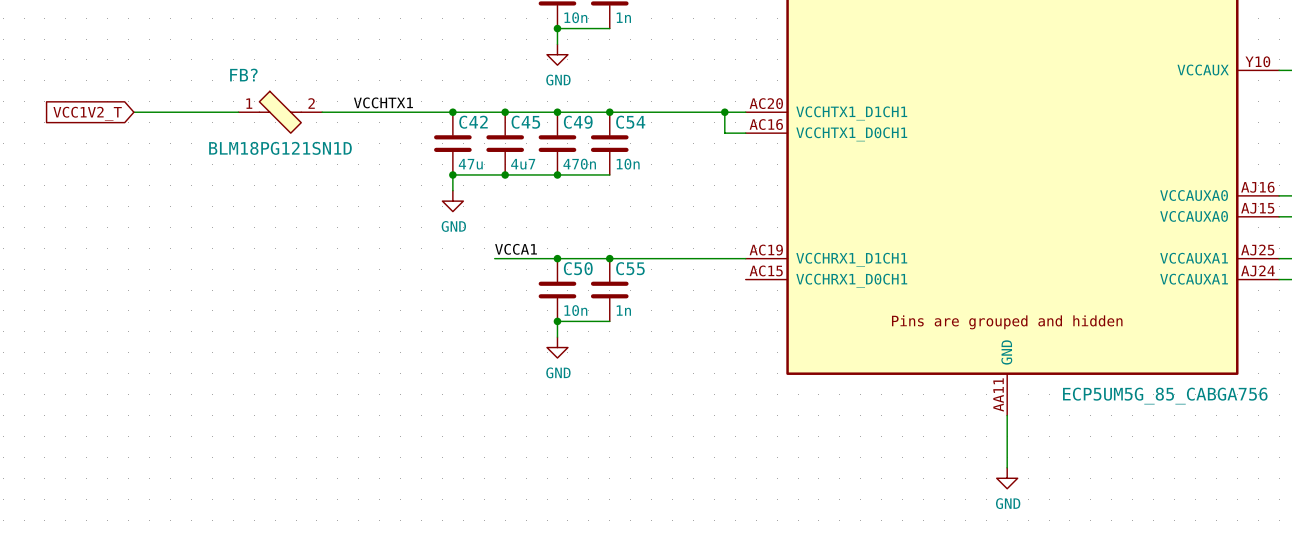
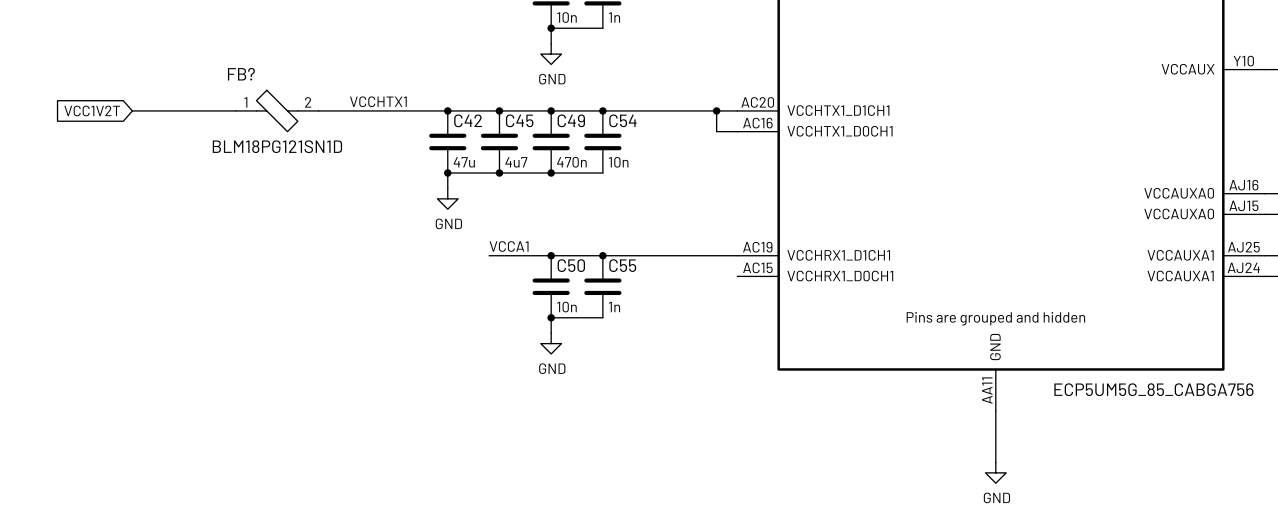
global label: VCC1V2_T (87, 113) -> VCC1V2T (92, 110)

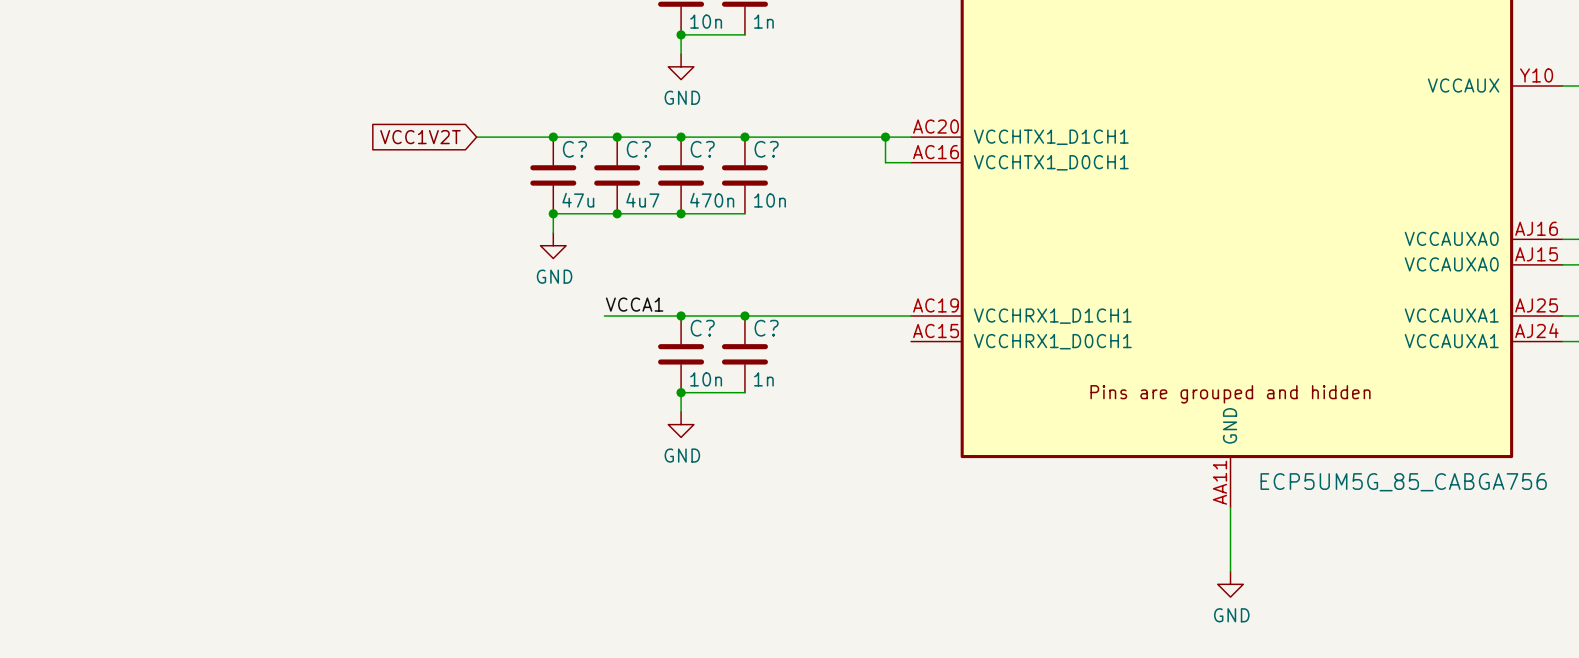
label: VCCHTX1 (378, 101) -> none
global label: VCC1V2T (92, 110) -> none
wire: (132, 110) (235, 110) -> none
FB?: BLM18PG121SN1D (277, 110) -> none
wire: (318, 110) (385, 110) -> none
global label: none -> VCC1V2T (420, 137)
C42 name: C42 (468, 120) -> C? (574, 149)
C45 name: C45 (519, 120) -> C? (638, 149)
C49 name: C49 (571, 120) -> C? (702, 149)
C54 name: C54 (622, 120) -> C? (766, 149)
C50 name: C50 (571, 265) -> C? (702, 328)
C55 name: C55 (622, 265) -> C? (766, 328)

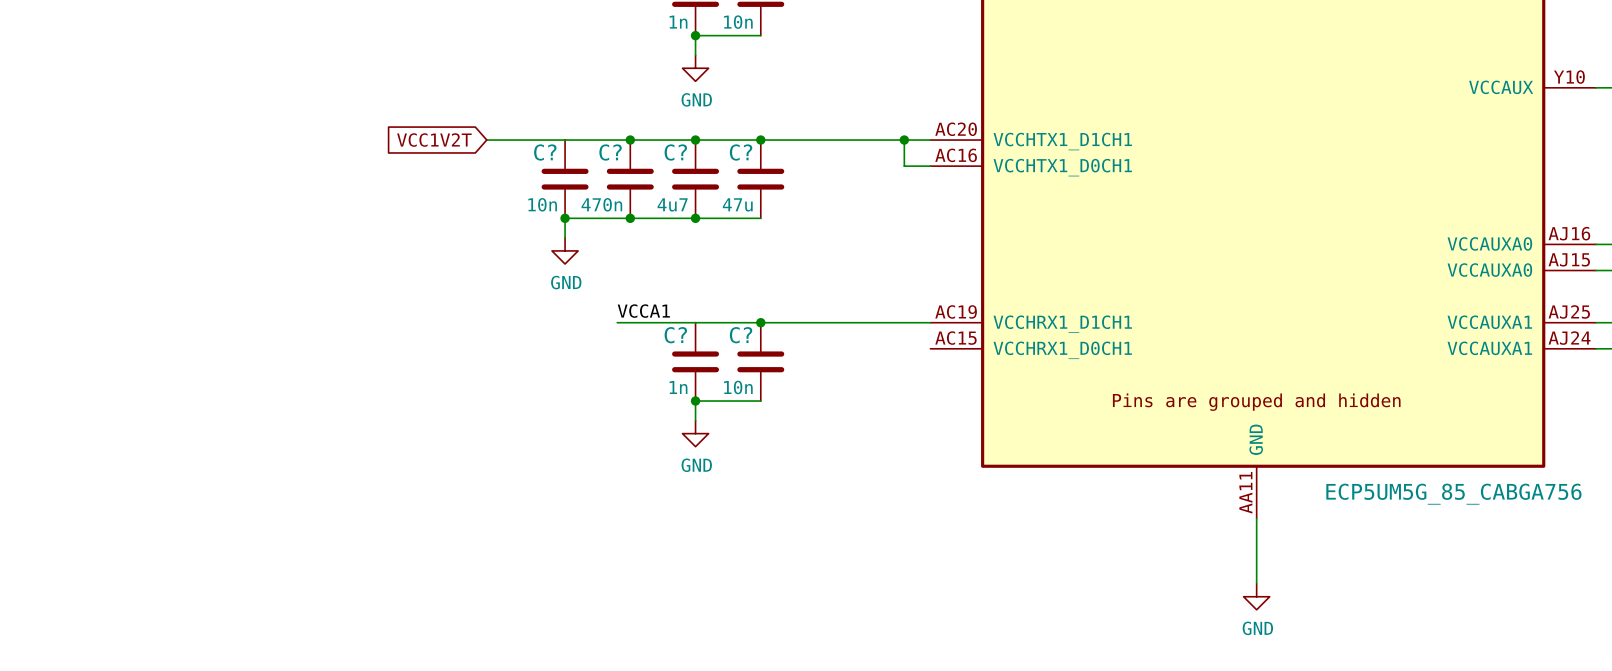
part text: 10n (706, 21) -> 1n (678, 22)
part text: 1n (763, 21) -> 10n (738, 22)
junction: (553, 137) -> none
C? name position: C? (574, 149) -> C? (545, 152)
C? name position: C? (638, 149) -> C? (610, 152)
C? name position: C? (702, 149) -> C? (675, 152)
C? name position: C? (766, 149) -> C? (741, 152)
C? text: 47u (578, 200) -> 10n (542, 204)
C? text: 4u7 (642, 200) -> 470n (601, 204)
C? text: 470n (712, 200) -> 4u7 (672, 204)
C? text: 10n (770, 200) -> 47u (737, 204)
junction: (681, 316) -> none
C? name position: C? (702, 328) -> C? (675, 335)
C? name position: C? (766, 328) -> C? (741, 335)
C? text: 10n (706, 379) -> 1n (678, 387)
C? text: 1n (763, 379) -> 10n (738, 387)

